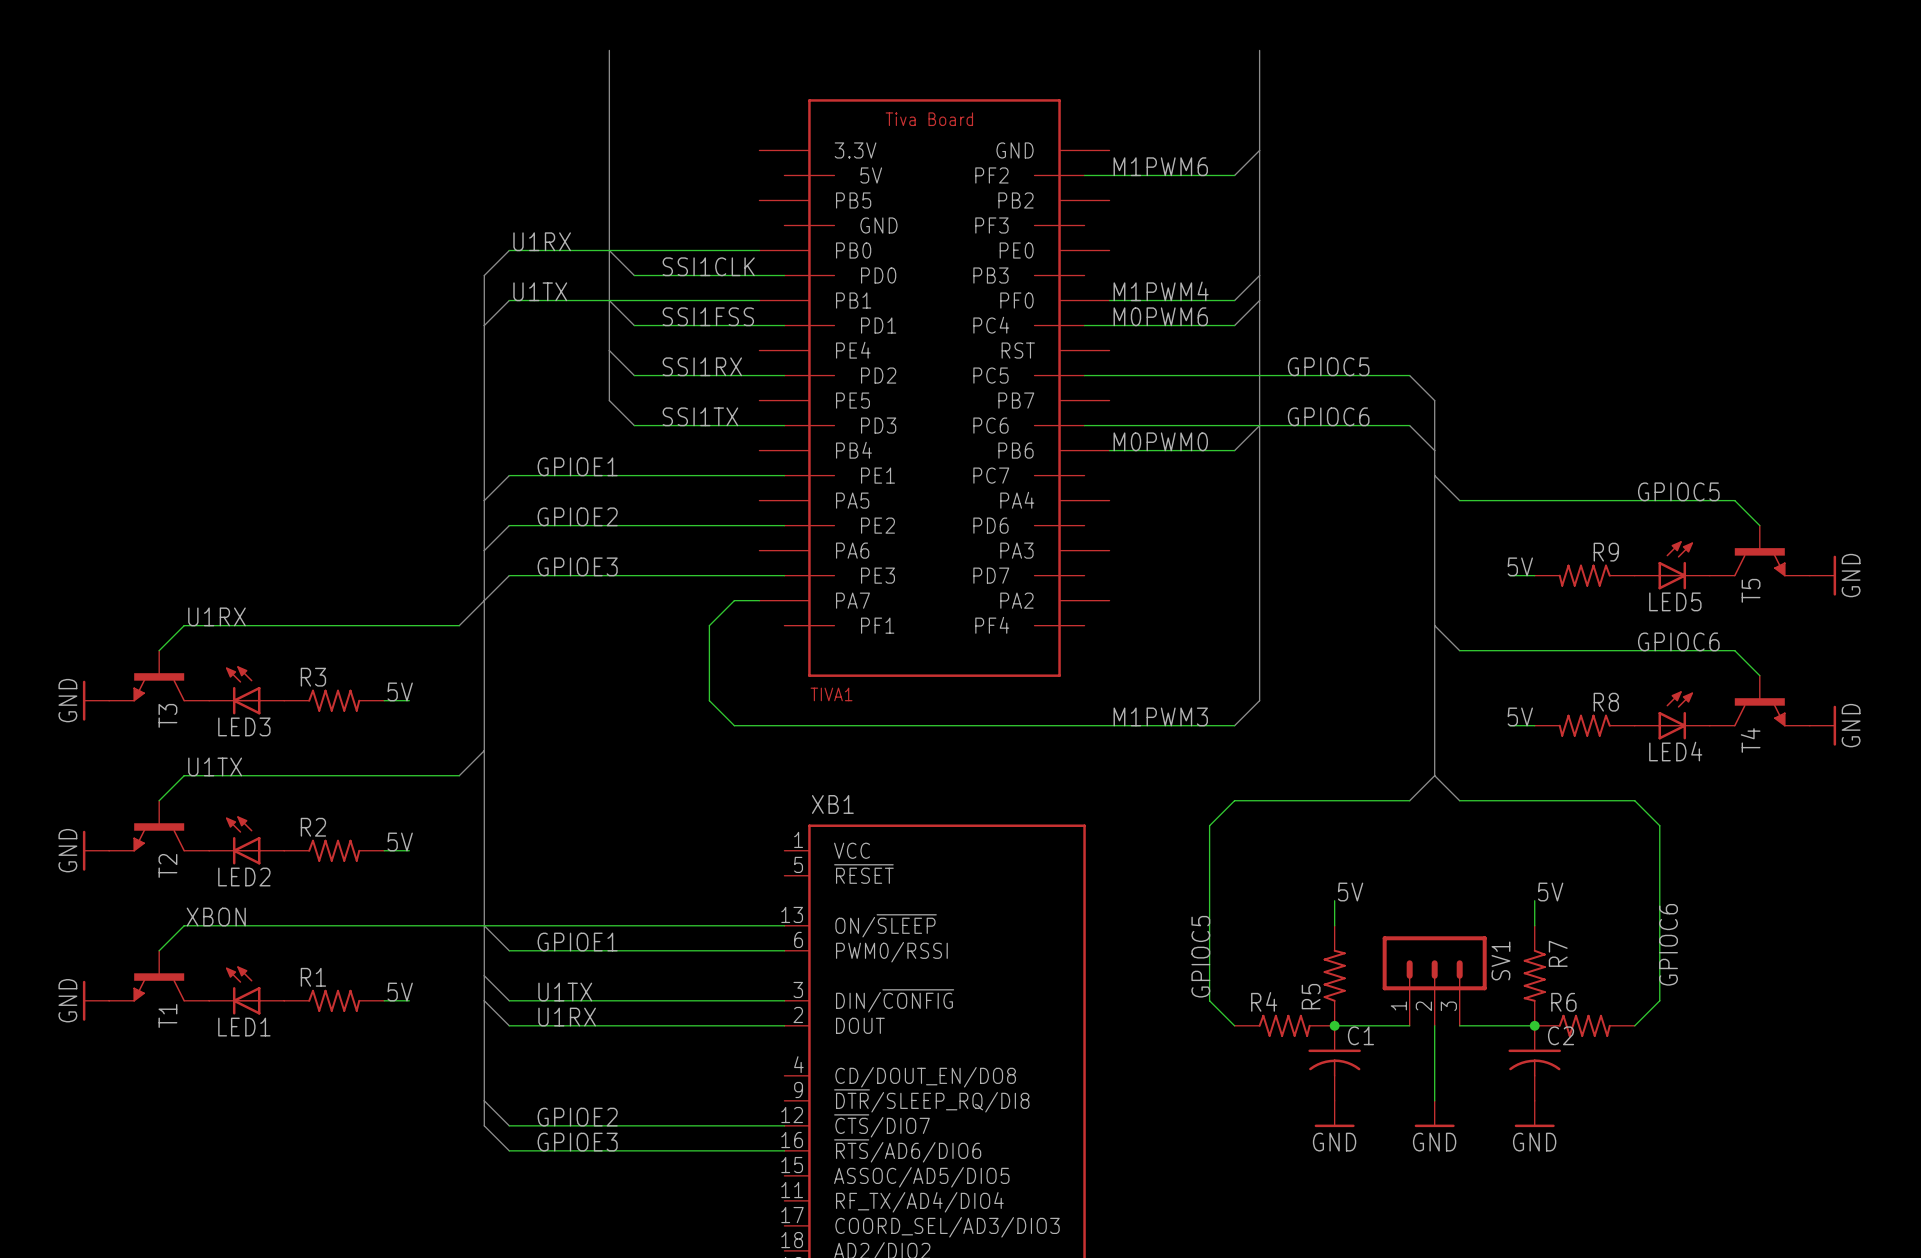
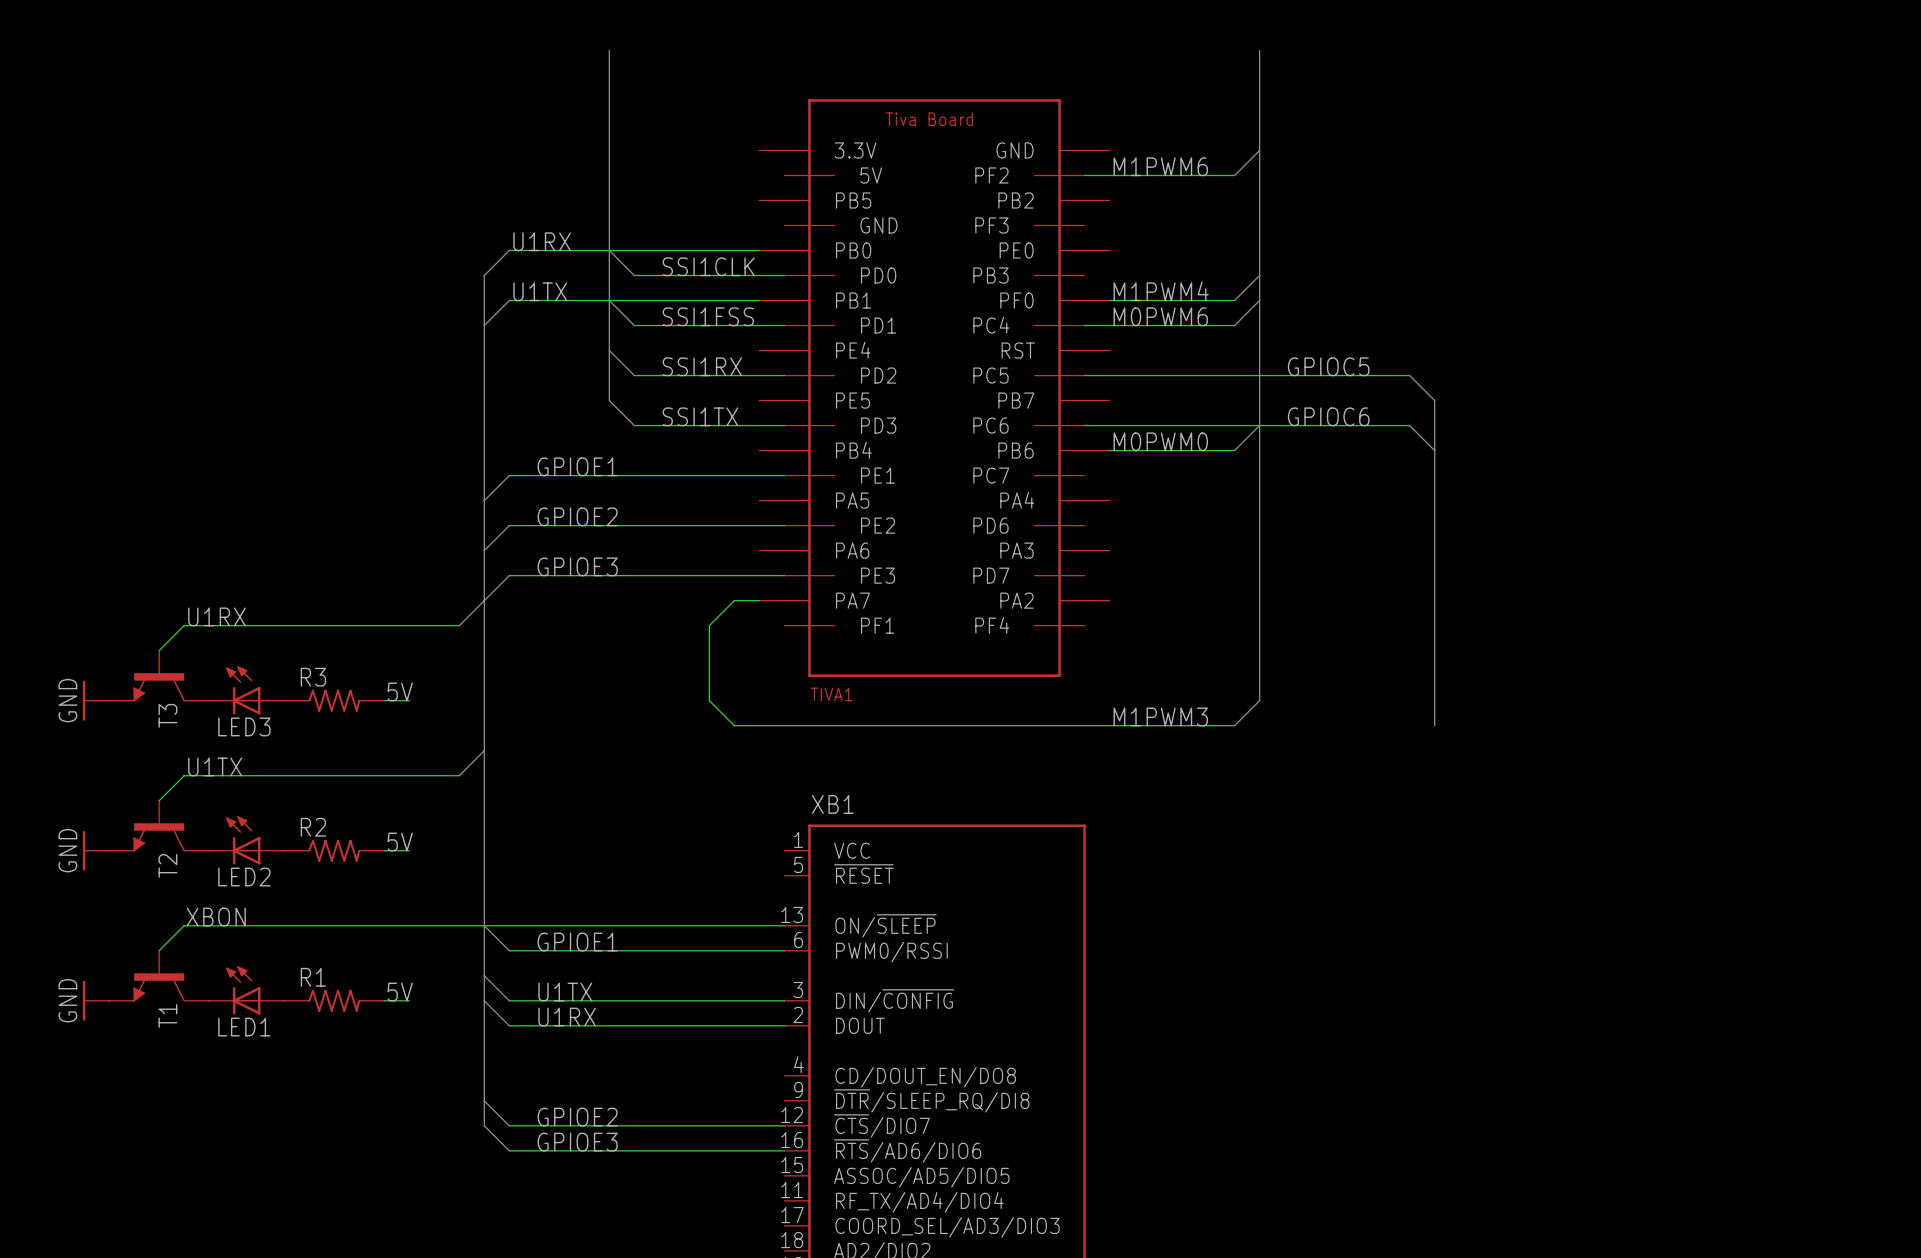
bus: (1434, 475) (1459, 500) -> none
label: GPIOC5 (1678, 491) -> none
wire: (1459, 500) (1734, 500) (1759, 525) -> none
T5: (1759, 551) -> none
LED5: (1672, 565) -> none
label: 5V (1520, 566) -> none
wire: (1509, 575) (1534, 575) -> none
R9: (1584, 575) -> none
power symbol: GND (1822, 575) -> none
bus: (1434, 625) (1459, 650) -> none
label: GPIOC6 (1678, 641) -> none
wire: (1459, 650) (1734, 650) (1759, 675) -> none
T4: (1759, 701) -> none
LED4: (1672, 715) -> none
label: 5V (1520, 716) -> none
bus: (1434, 725) (1434, 775) -> none
wire: (1509, 725) (1534, 725) -> none
R8: (1584, 725) -> none
power symbol: GND (1822, 725) -> none
bus: (1434, 775) (1409, 800) -> none
bus: (1434, 775) (1459, 800) -> none
wire: (1409, 800) (1234, 800) (1209, 825) (1209, 1000) (1234, 1025) -> none
wire: (1459, 800) (1634, 800) (1659, 825) (1659, 1000) (1634, 1025) -> none
label: 5V (1350, 892) -> none
label: 5V (1550, 892) -> none
wire: (1334, 900) (1334, 925) -> none
wire: (1534, 900) (1534, 925) -> none
label: GPIOC6 (1668, 944) -> none
label: GPIOC5 (1200, 956) -> none
R5: (1334, 975) -> none
R7: (1534, 975) -> none
SV1: (1434, 981) -> none
R4: (1284, 1025) -> none
wire: (1334, 1025) (1409, 1025) -> none
junction: (1334, 1025) -> none
wire: (1434, 1025) (1434, 1100) -> none
wire: (1459, 1025) (1534, 1025) -> none
junction: (1534, 1025) -> none
R6: (1584, 1025) -> none
C1: (1334, 1063) -> none
C2: (1534, 1063) -> none
power symbol: GND (1334, 1113) -> none
power symbol: GND (1434, 1113) -> none
power symbol: GND (1534, 1113) -> none

